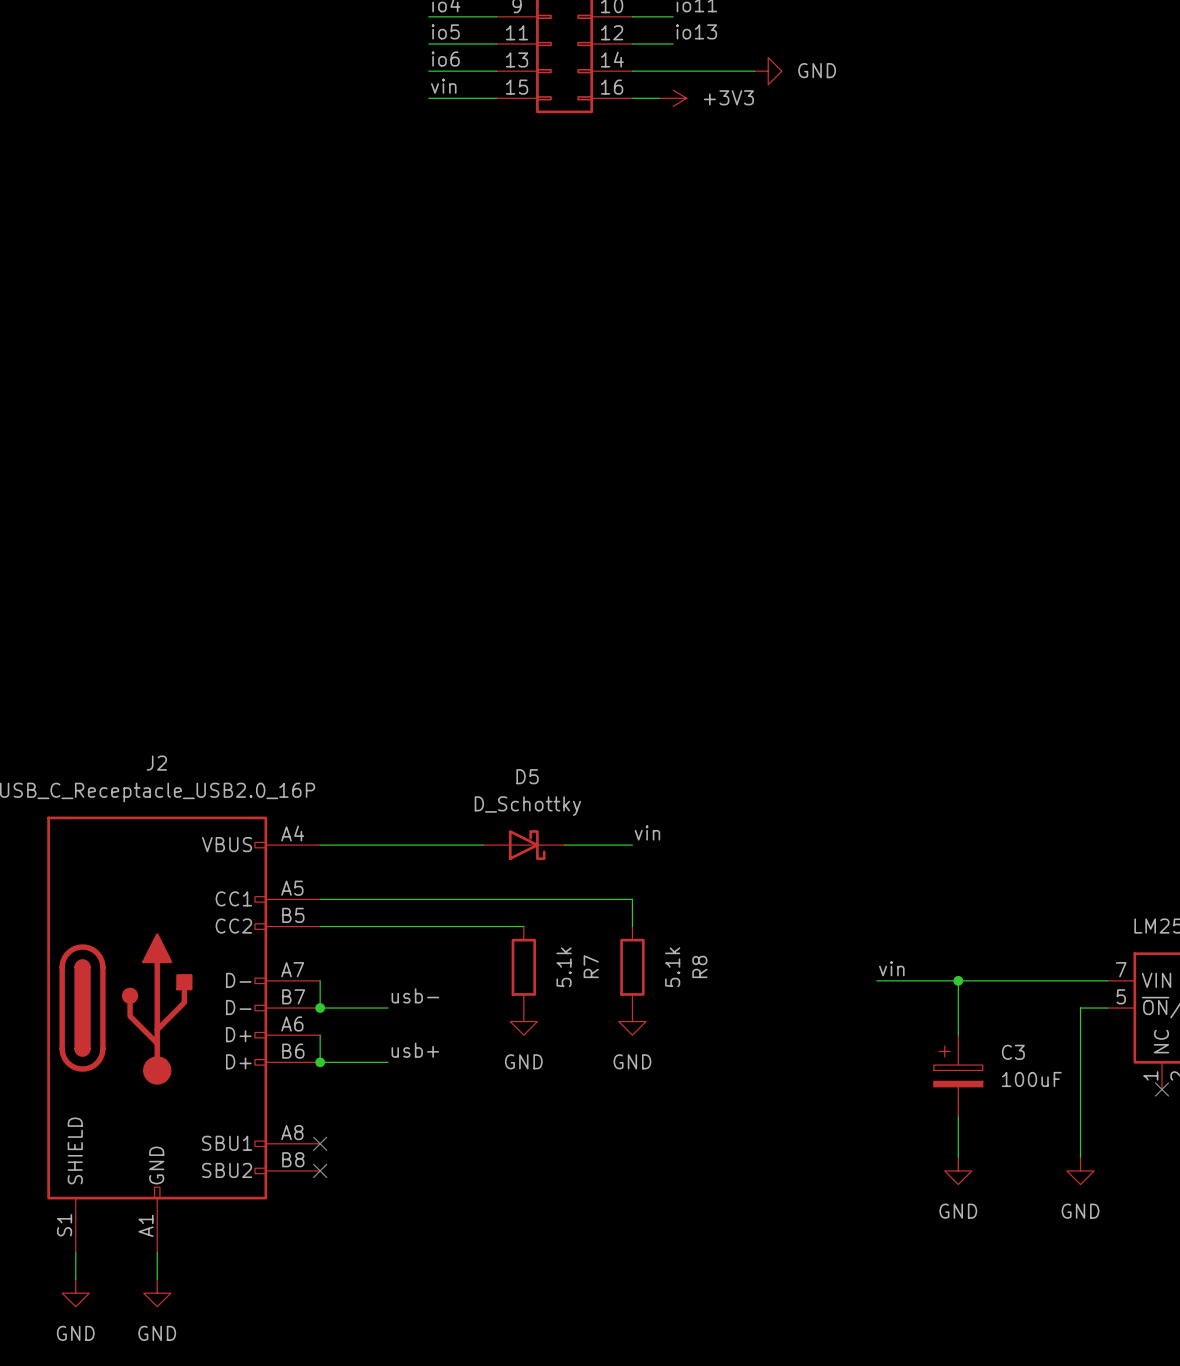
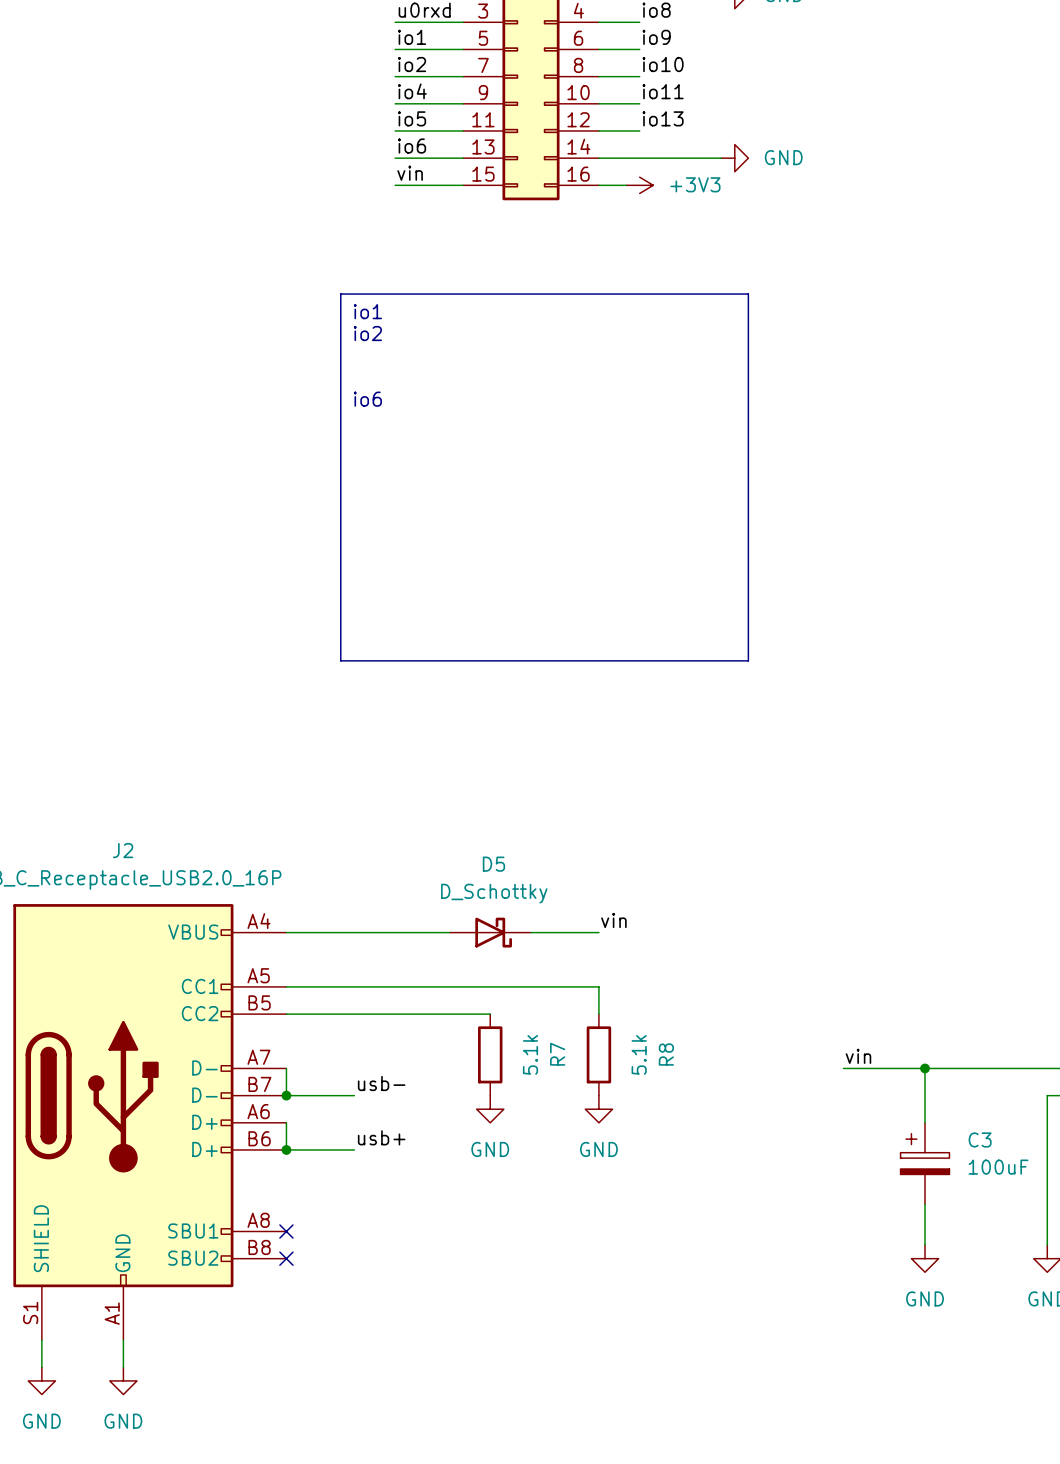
line: none -> (340, 294) (748, 294) (748, 660) (340, 660) (340, 294)
text: none -> io1 (367, 311)
text: none -> io2 (367, 333)
text: none -> io6 (367, 399)

